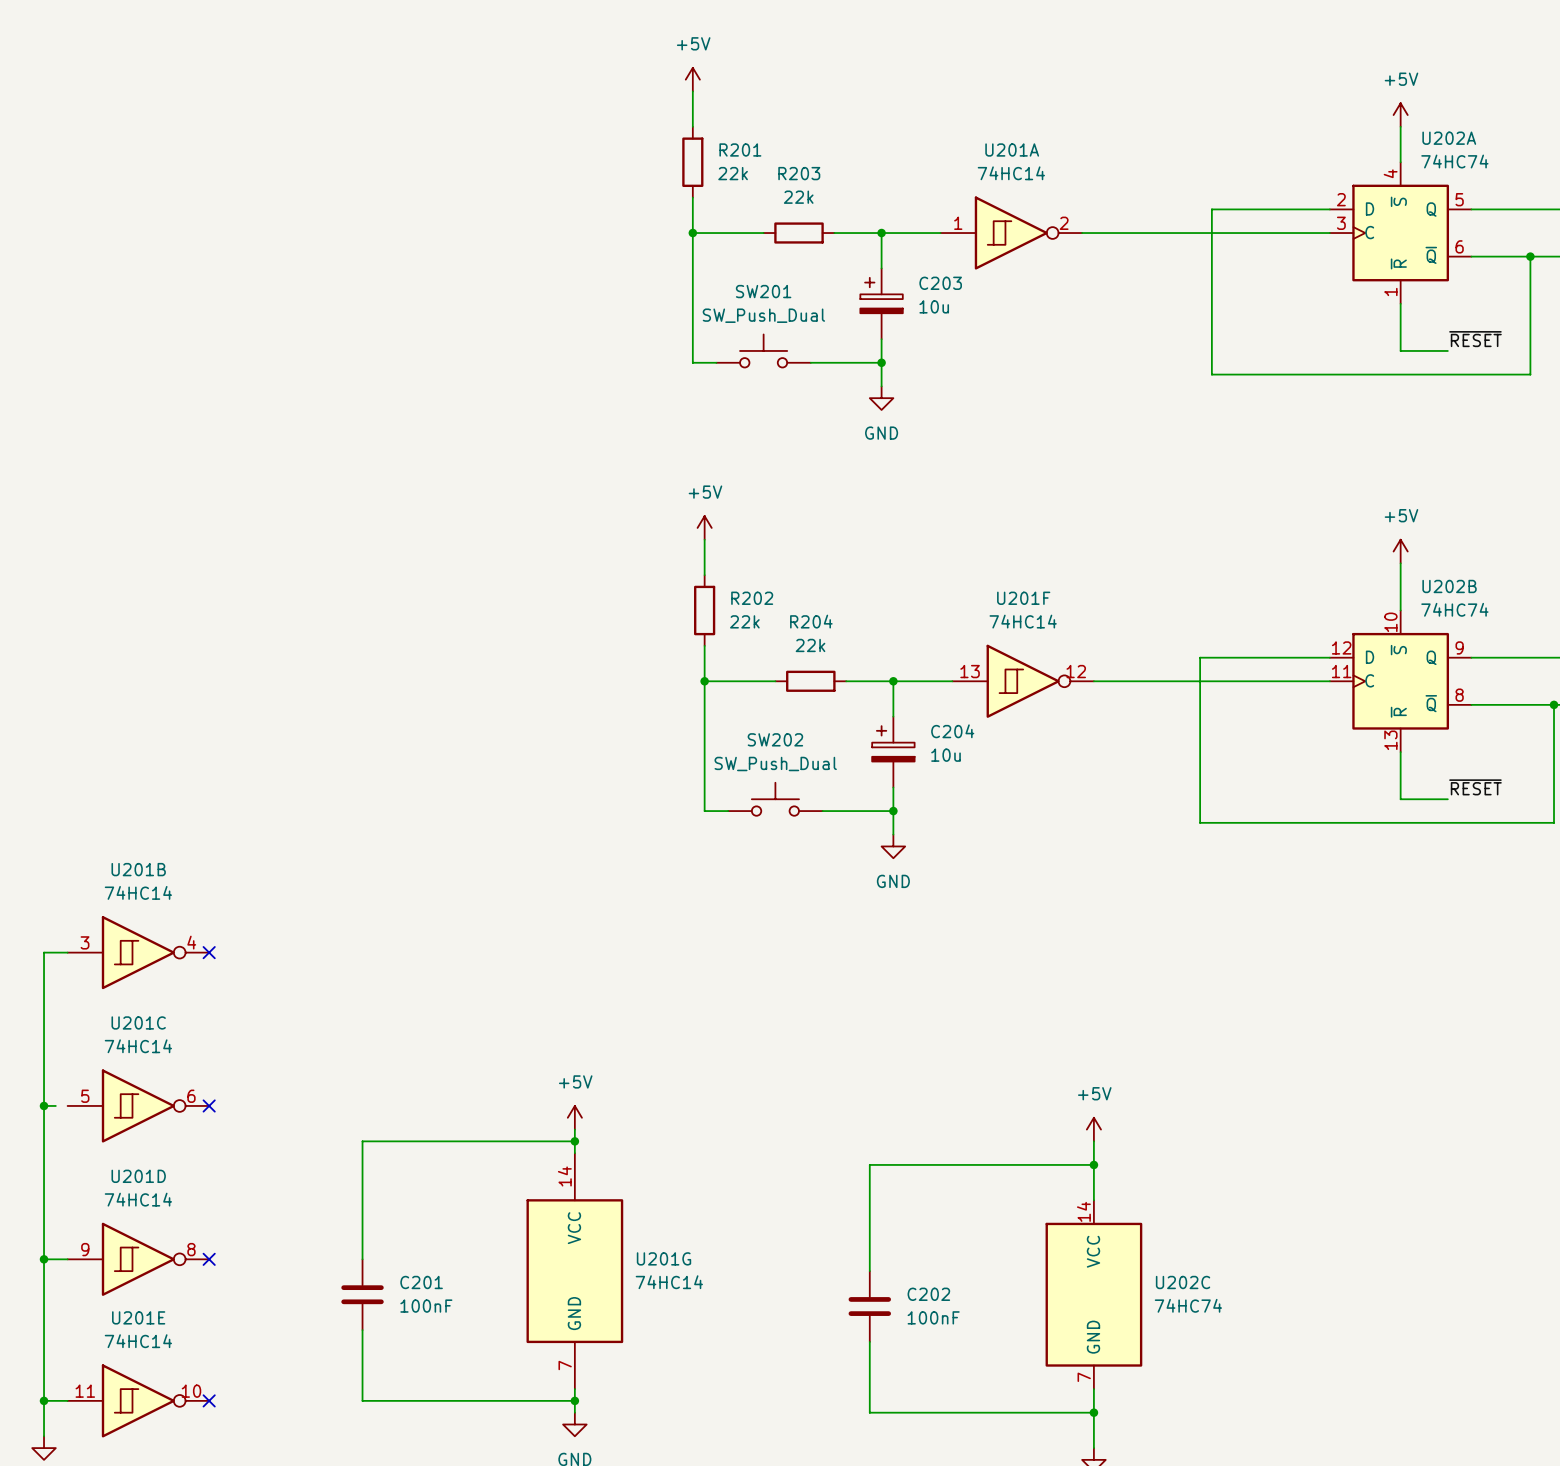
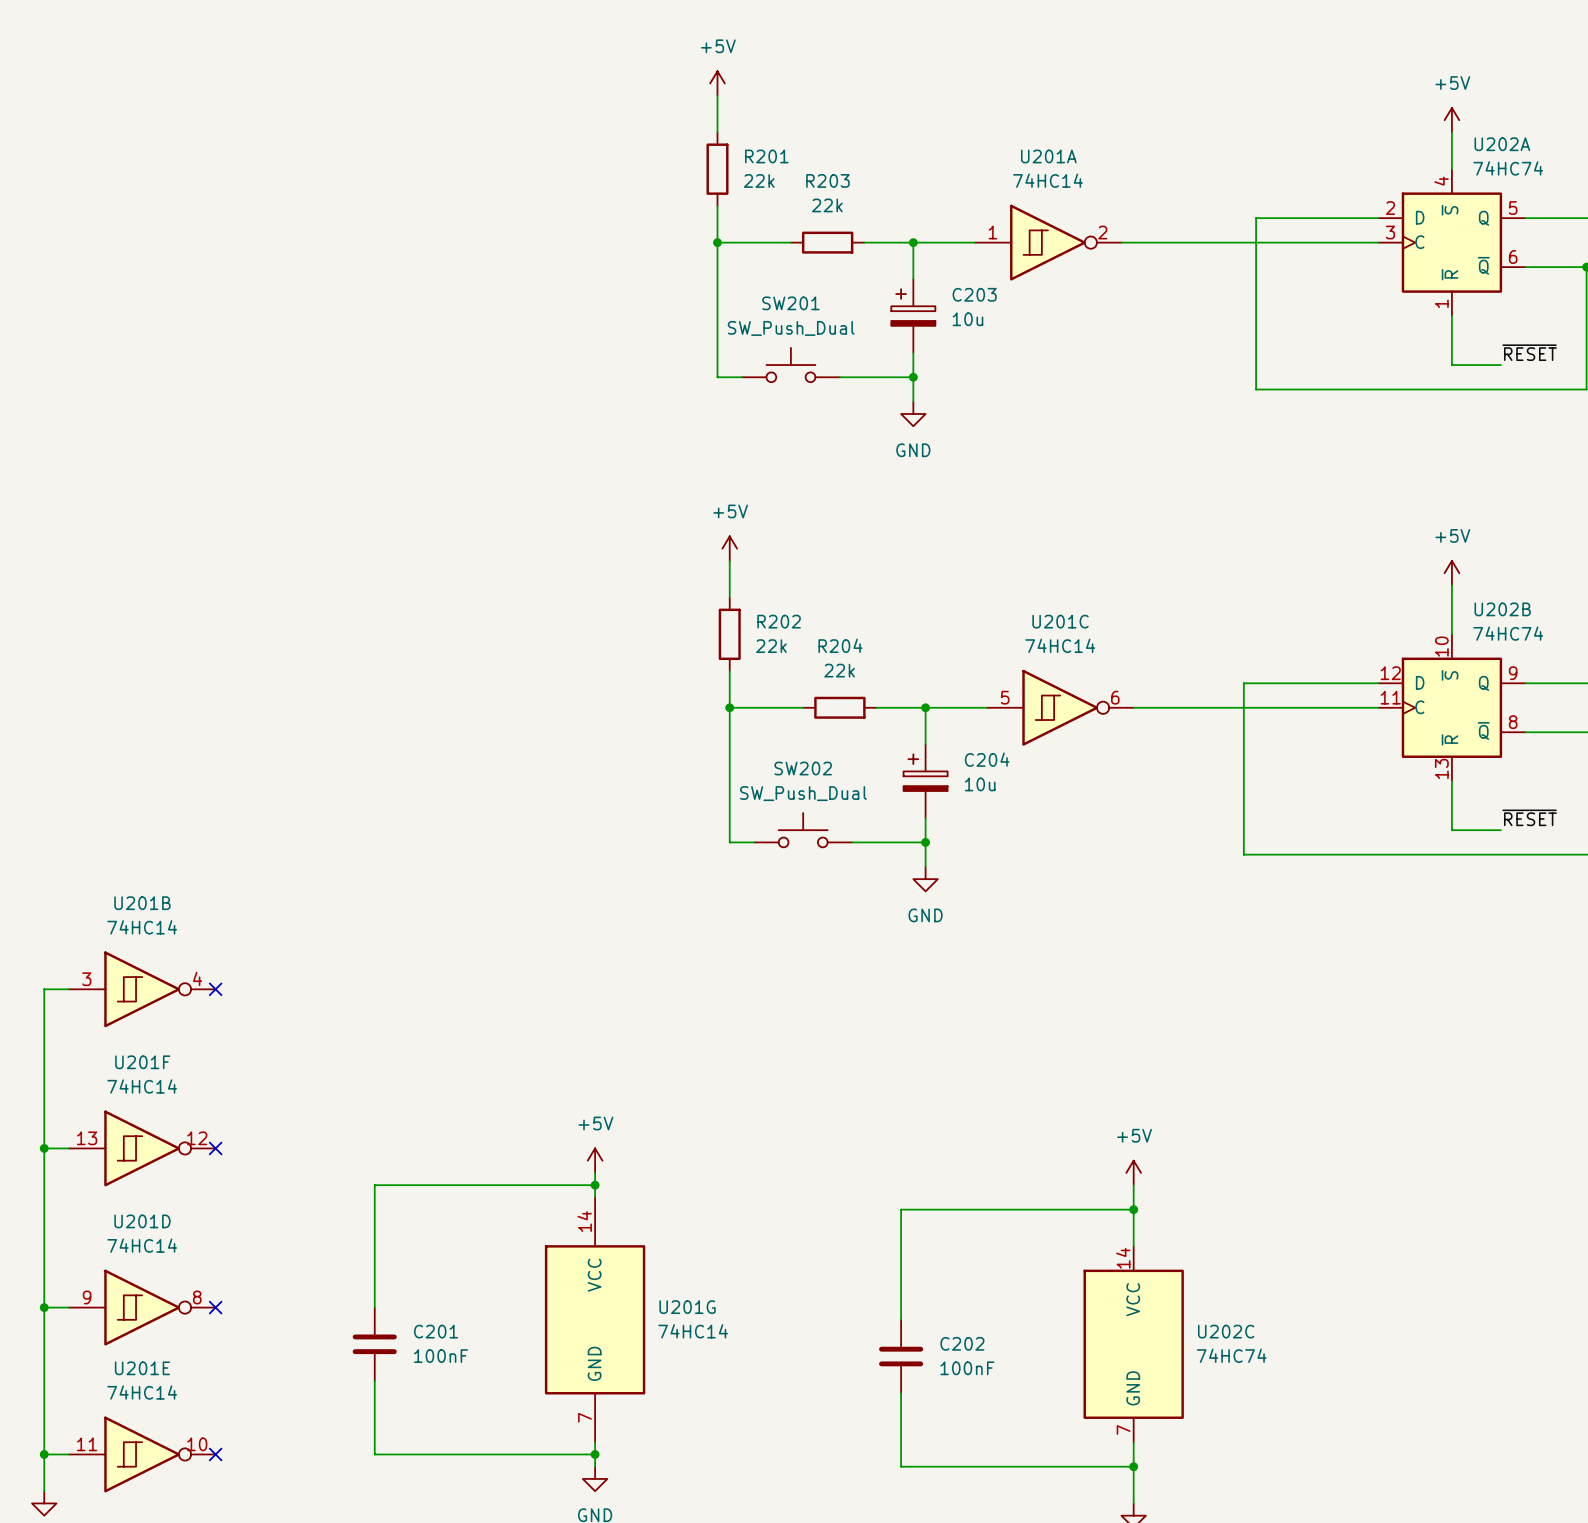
U201F position: (1023, 681) -> (142, 1148)
wire: none -> (56, 1148) (68, 1148)
U201C position: (138, 1105) -> (1060, 707)

